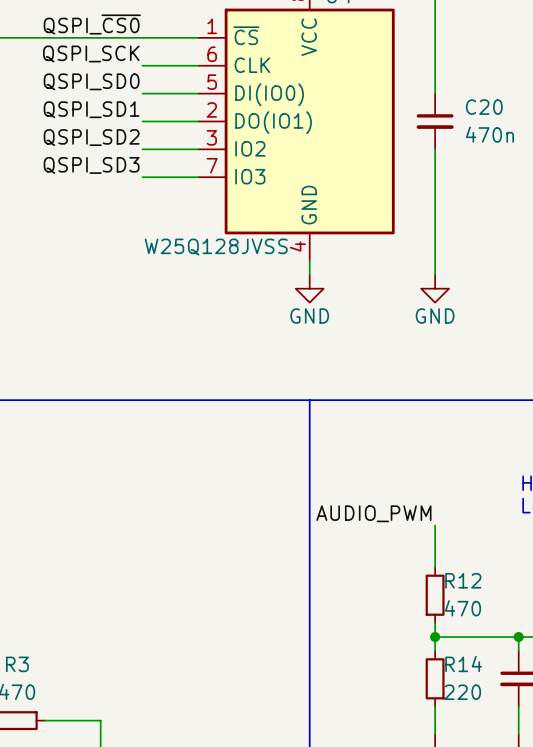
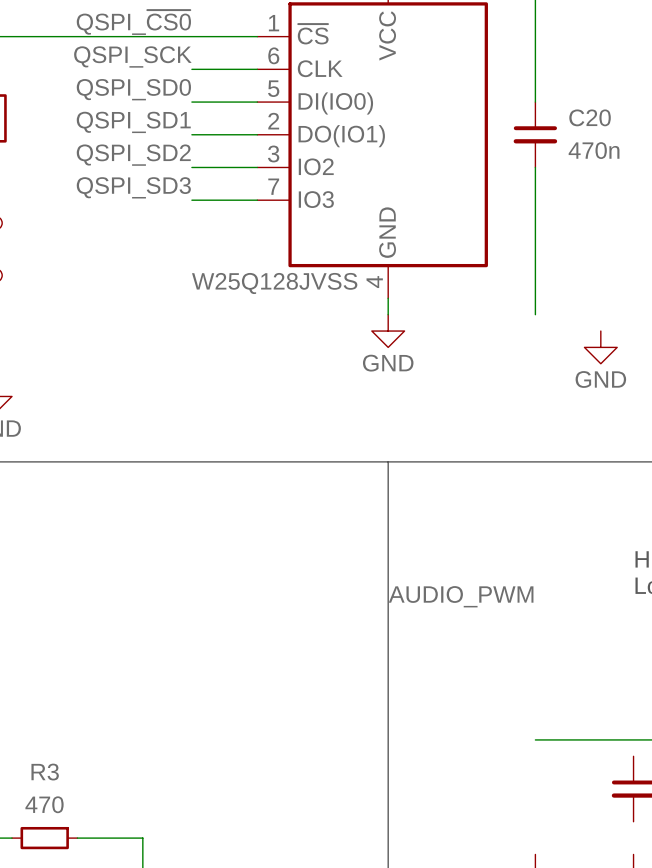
power symbol position: GND (435, 288) -> GND (600, 347)
wire: (435, 525) (435, 567) -> none
R12: 470 (435, 595) -> none
wire: (435, 623) (435, 650) -> none
junction: (435, 637) -> none
wire: (518, 637) (518, 650) -> none
junction: (518, 637) -> none
R14: 220 (435, 678) -> none
wire: (435, 706) (435, 734) -> none
wire: (518, 706) (518, 734) -> none

